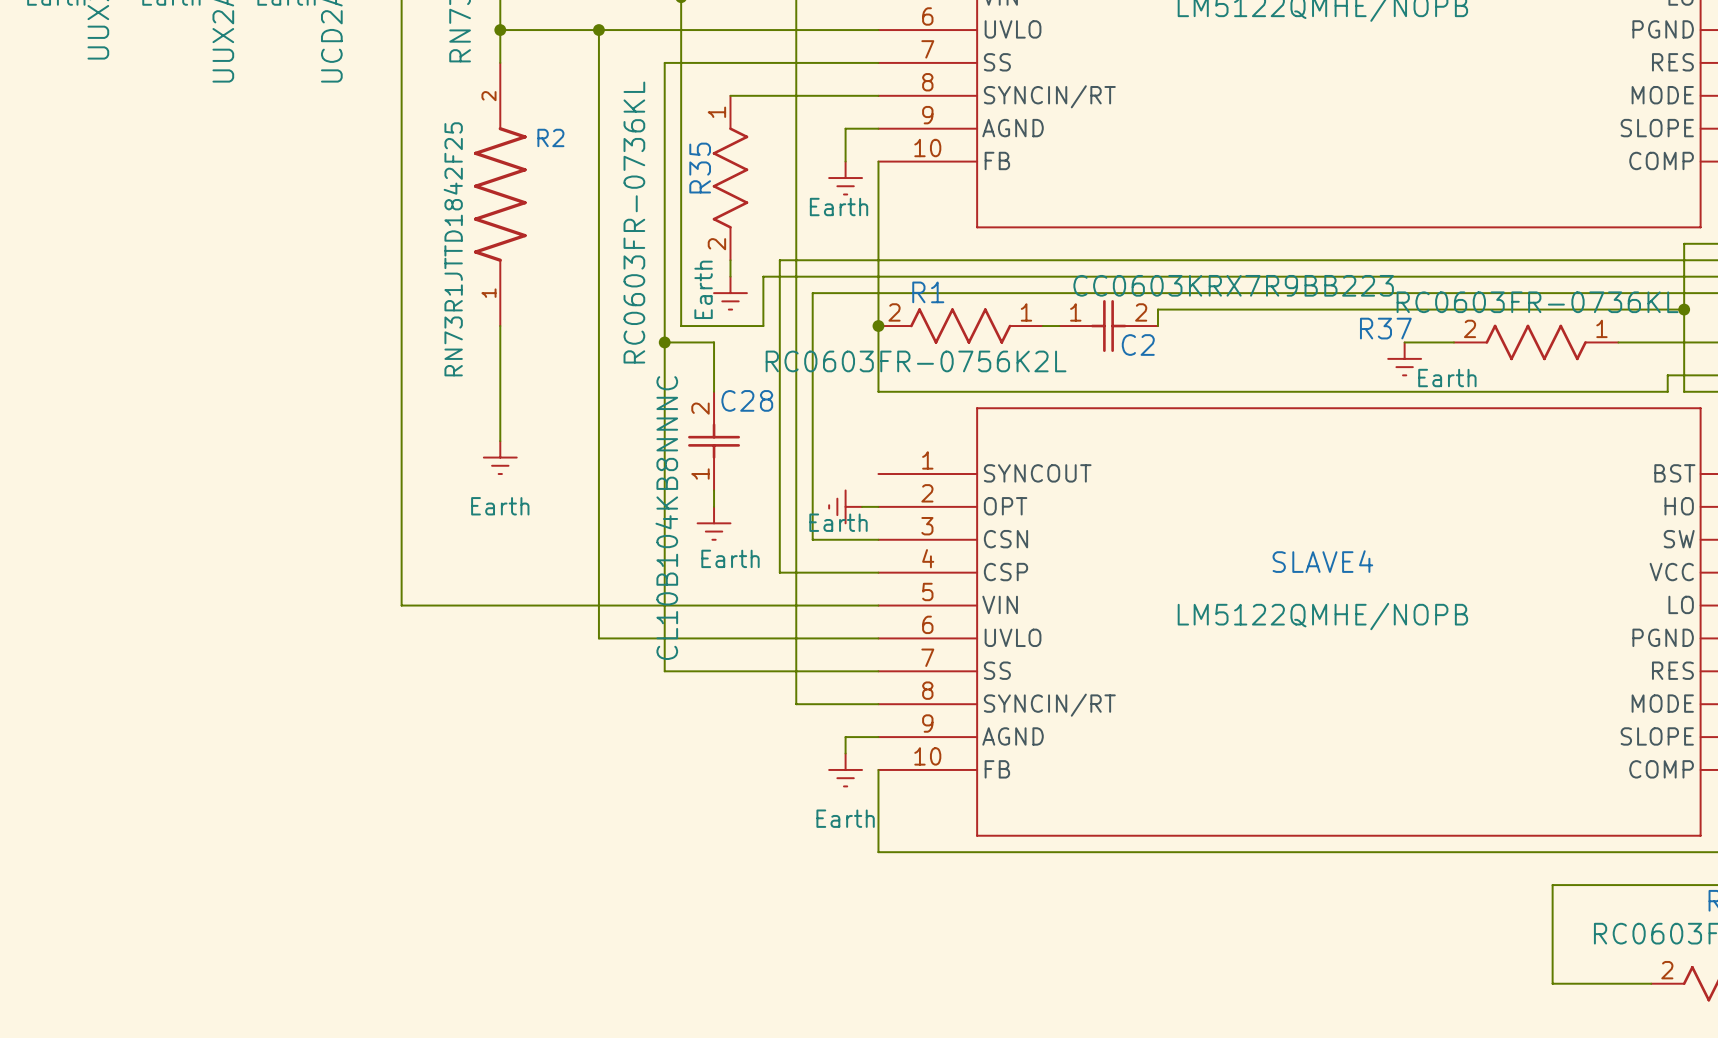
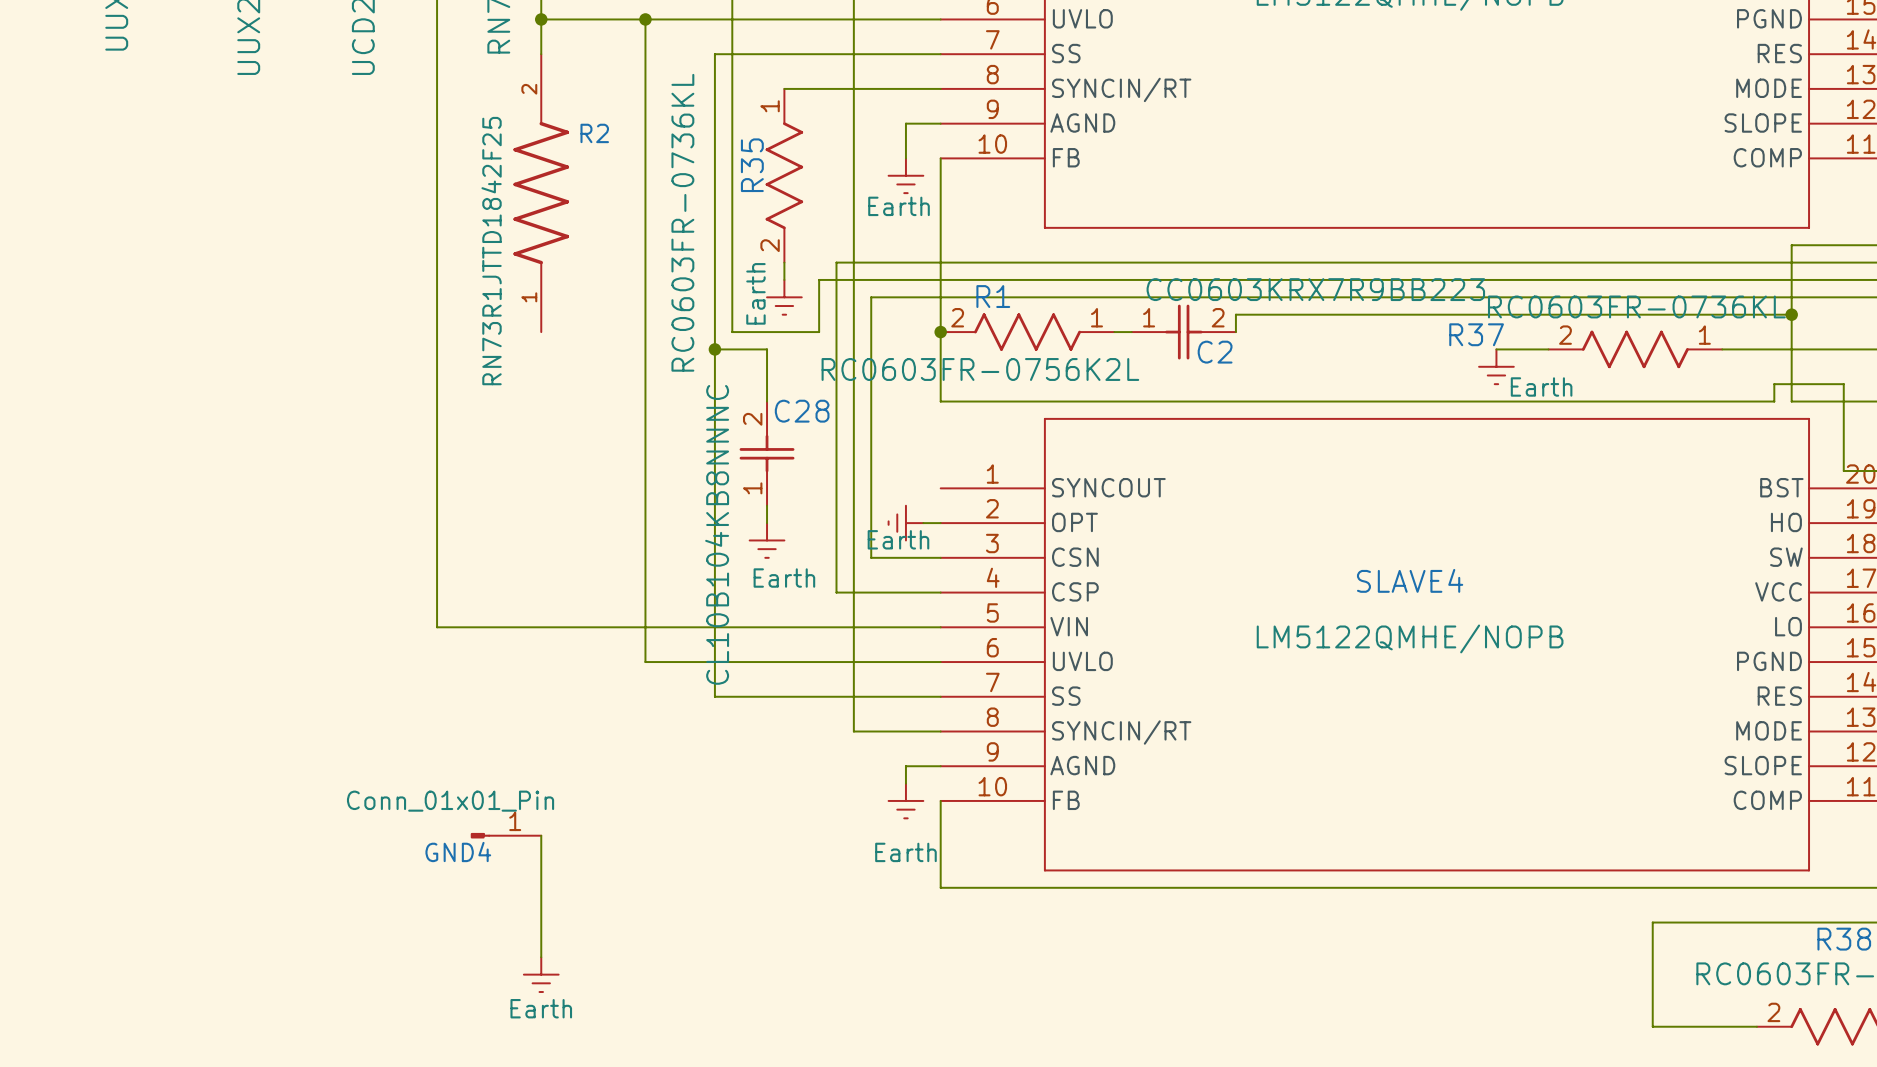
wire: (500, 326) (500, 441) -> none
power symbol: Earth (500, 457) -> none
GND4: none -> Conn_01x01_Pin (506, 835)
wire: none -> (541, 835) (541, 957)
power symbol: none -> Earth (541, 974)

